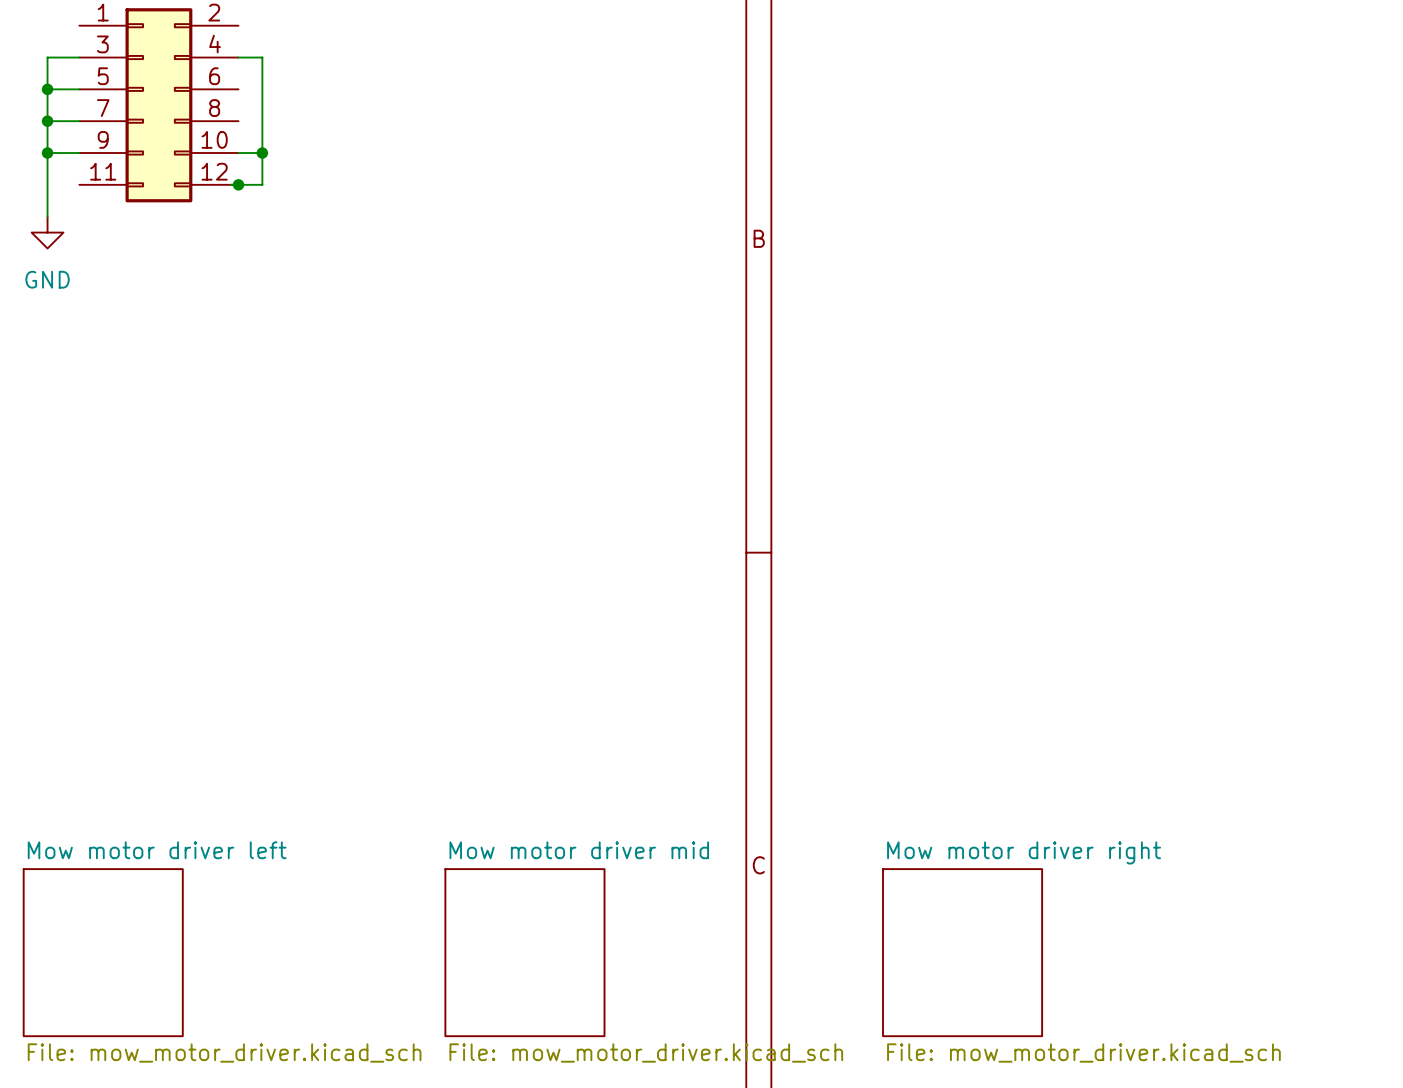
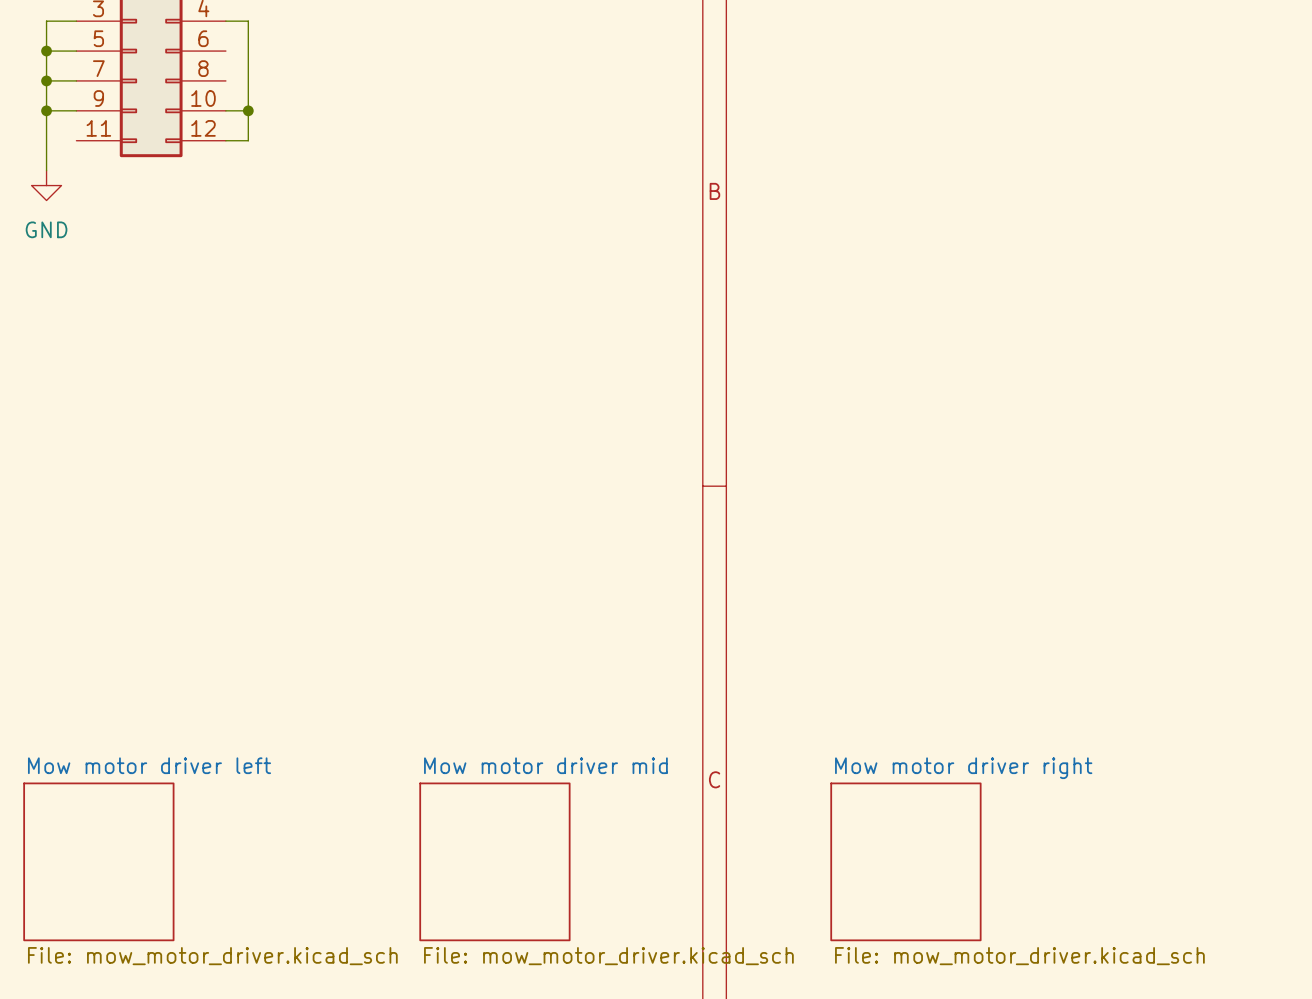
junction: (238, 184) -> none

